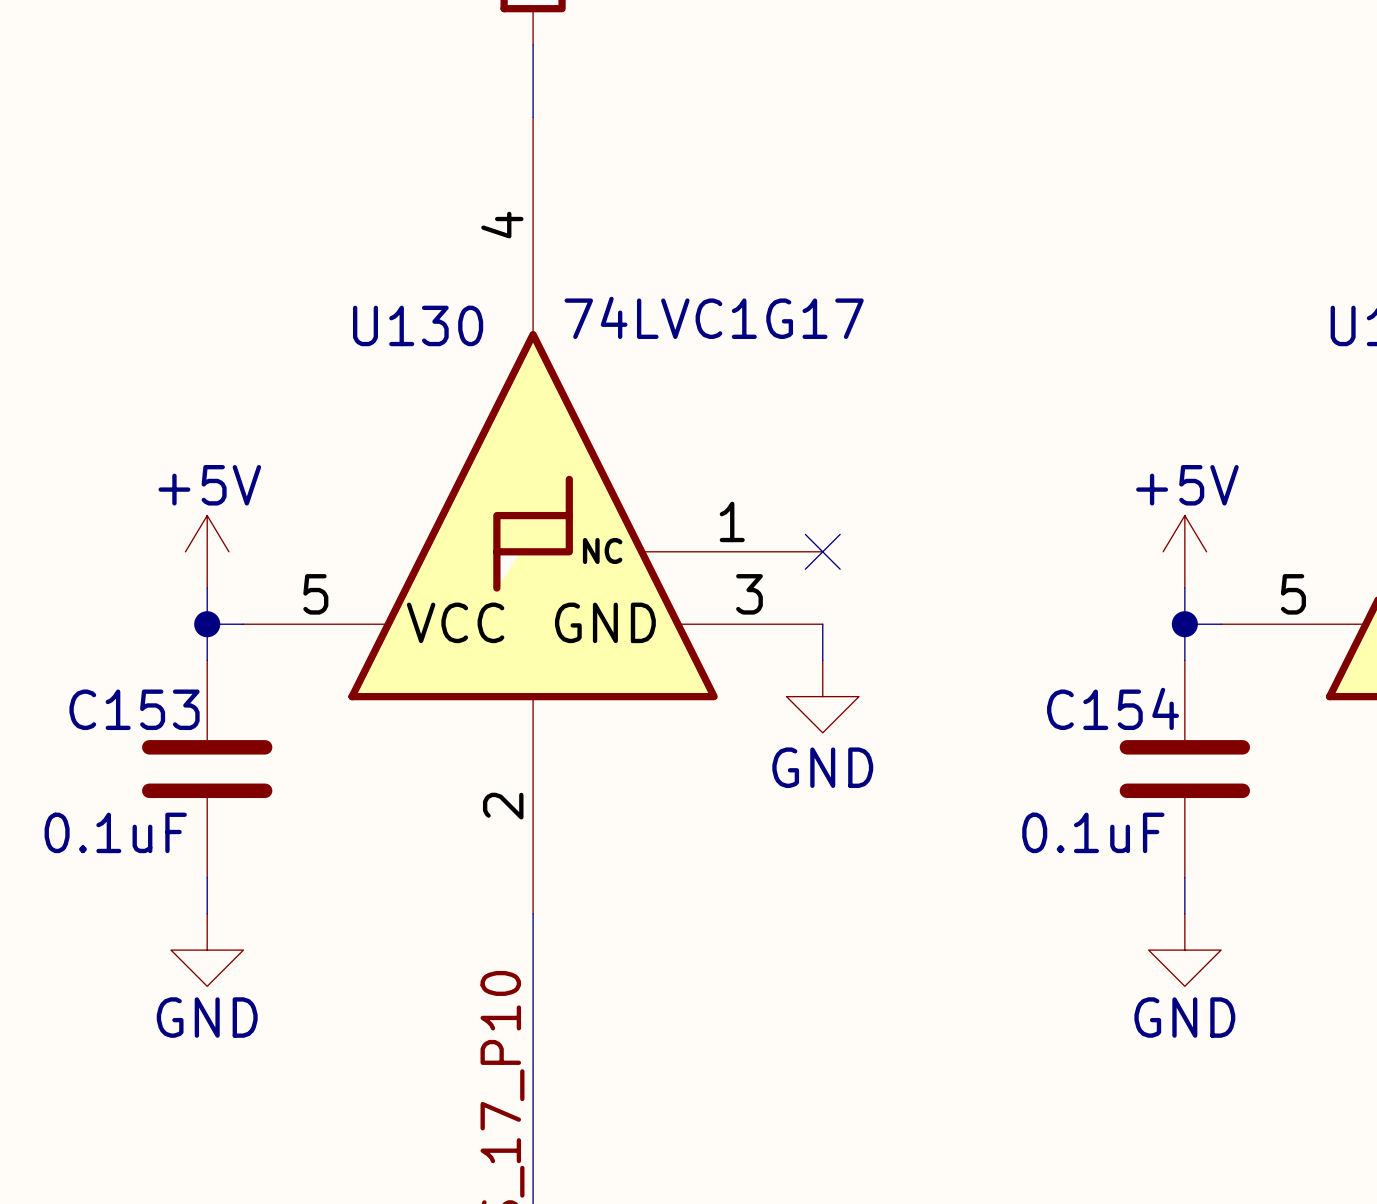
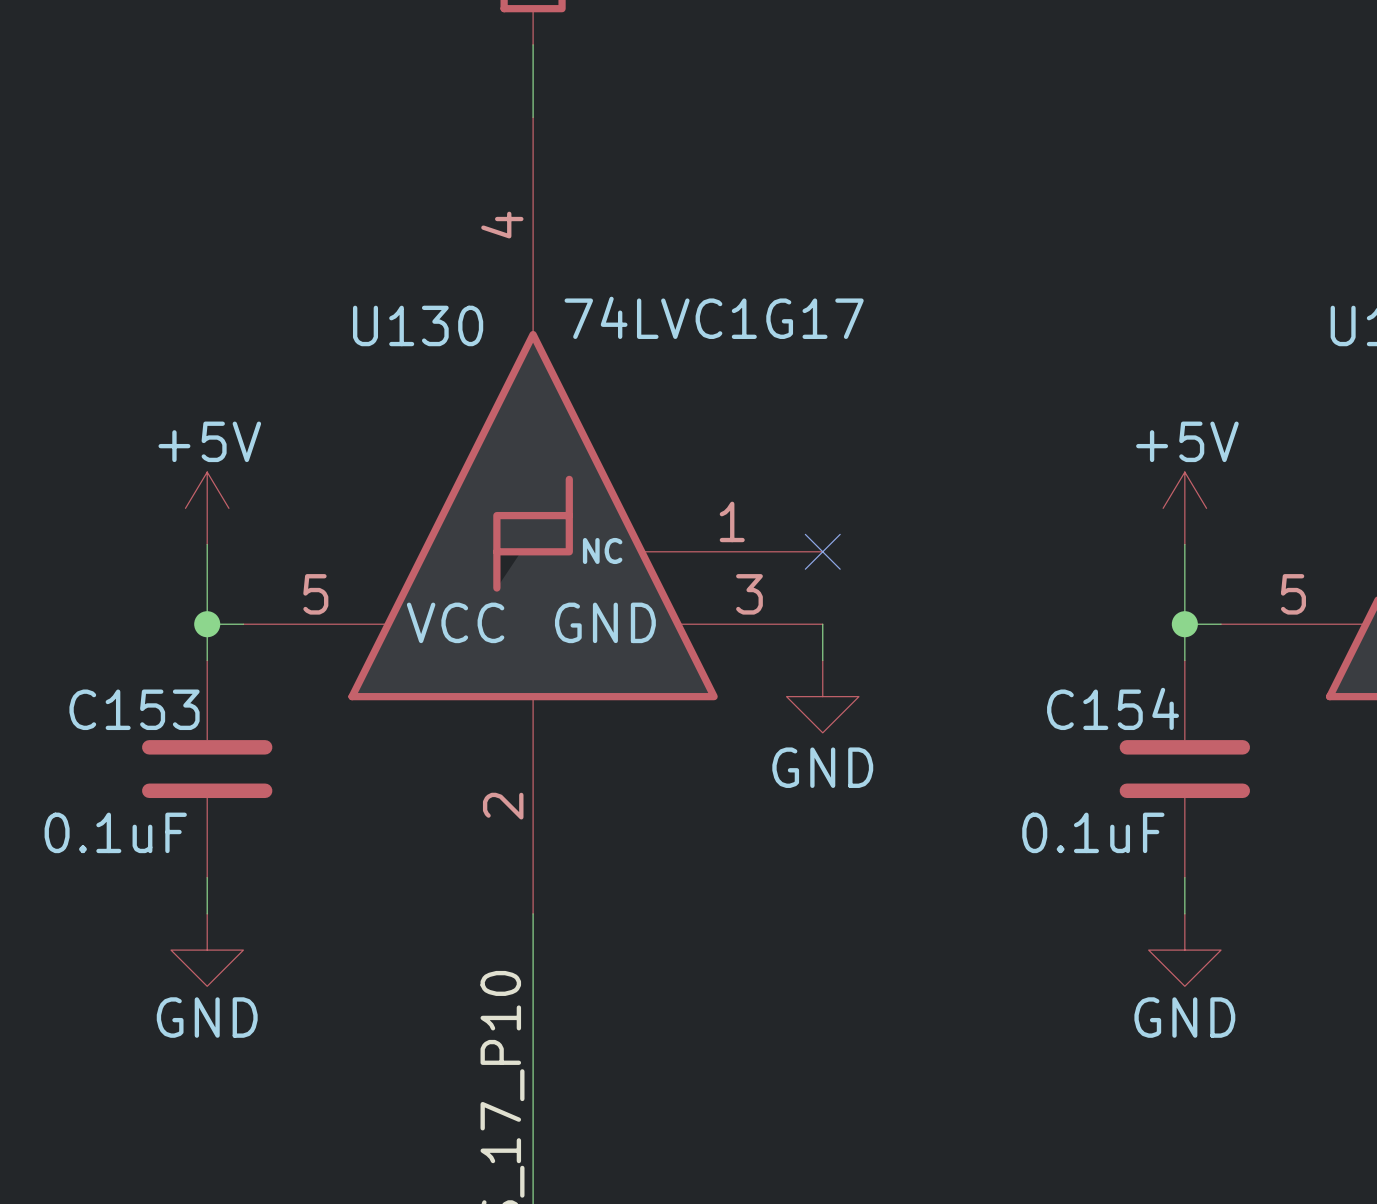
power symbol position: +5V (207, 551) -> +5V (207, 508)
power symbol position: +5V (1184, 551) -> +5V (1184, 508)

